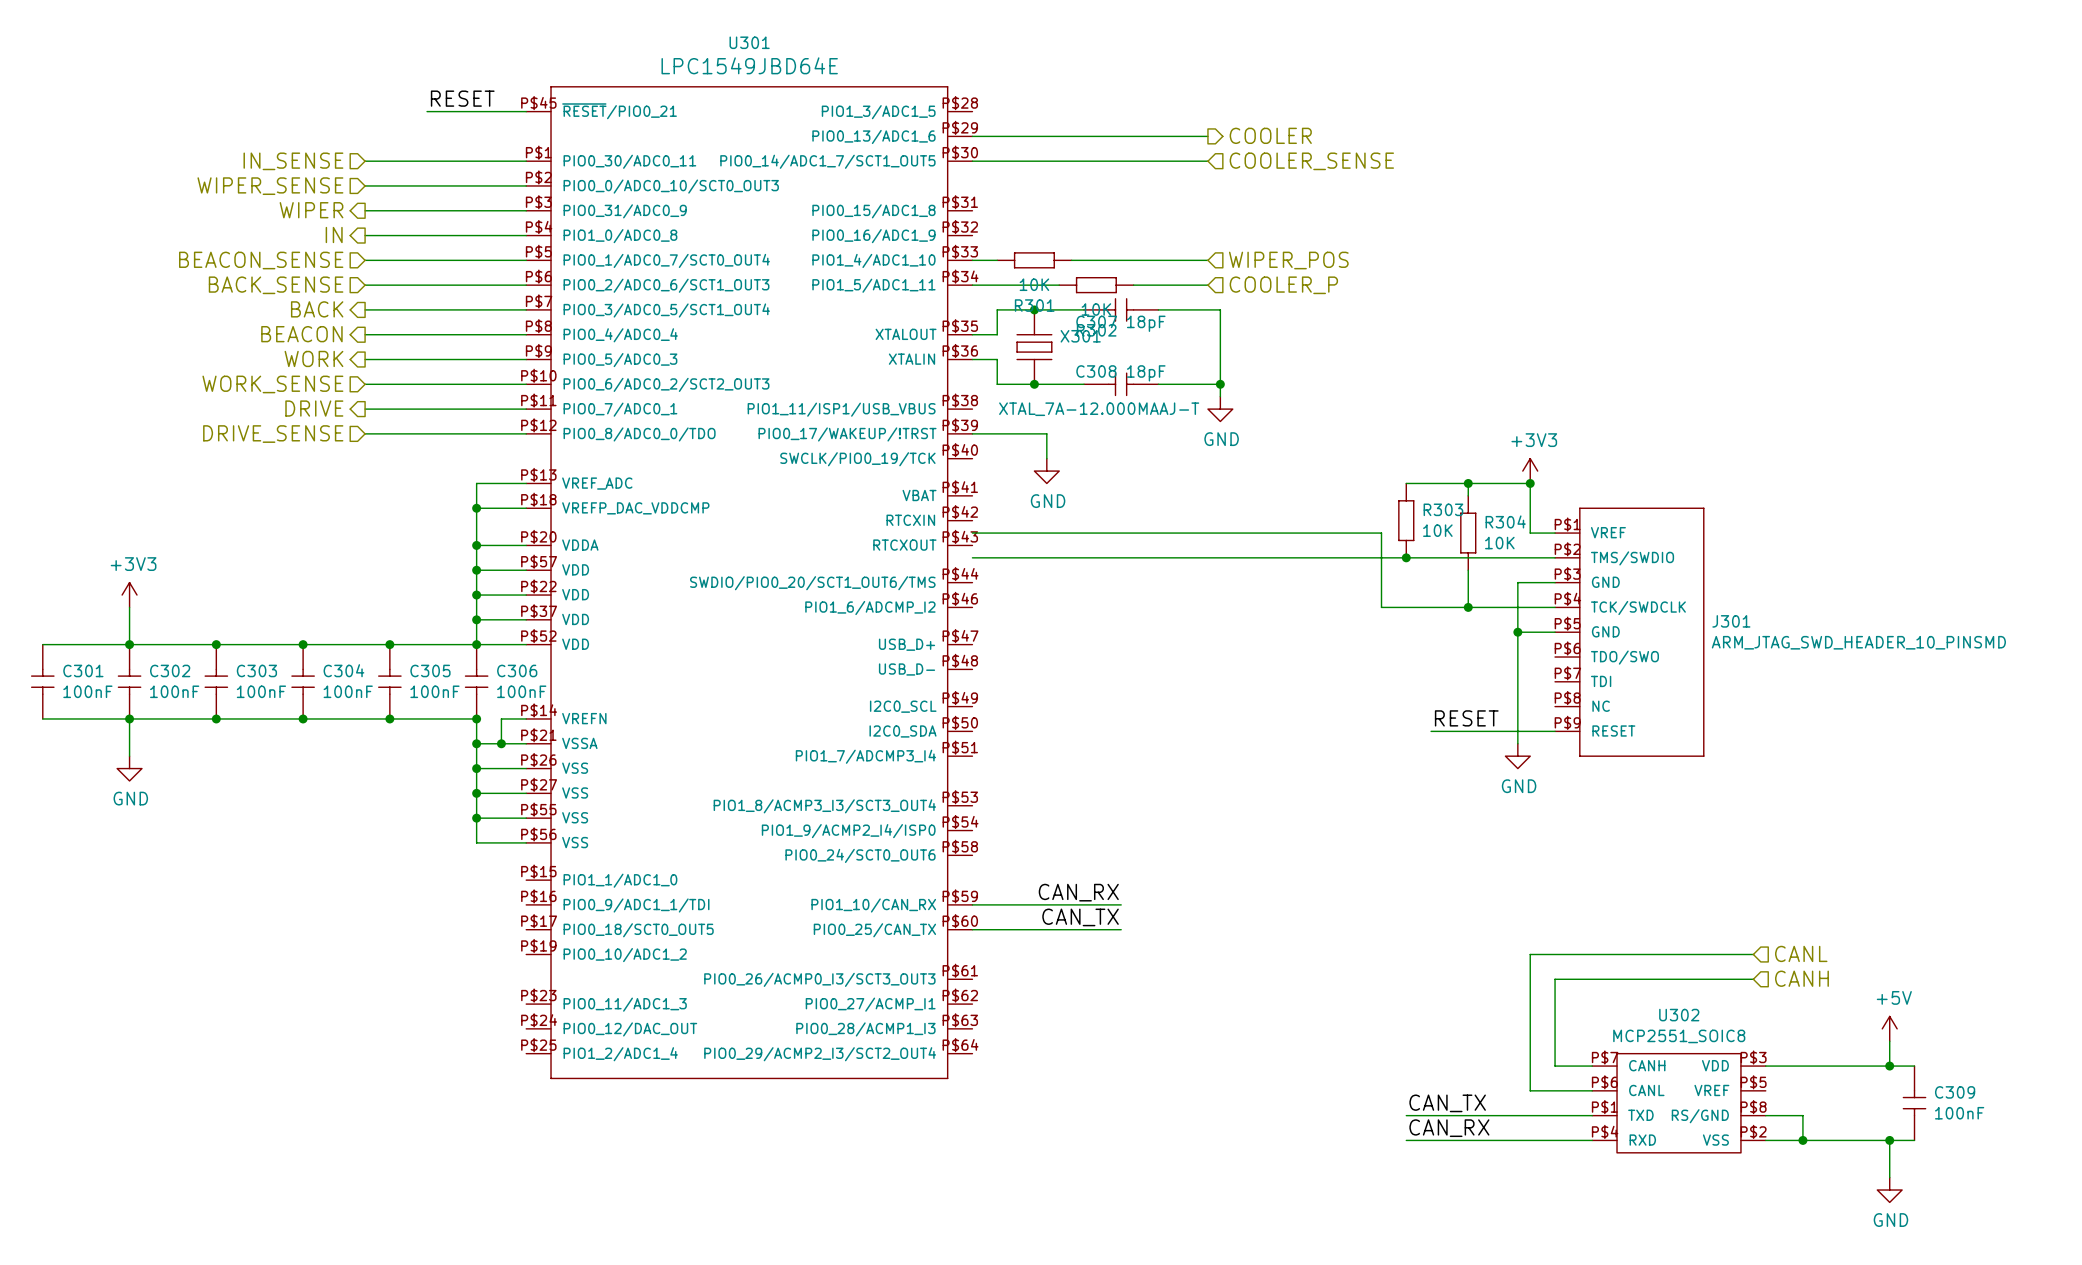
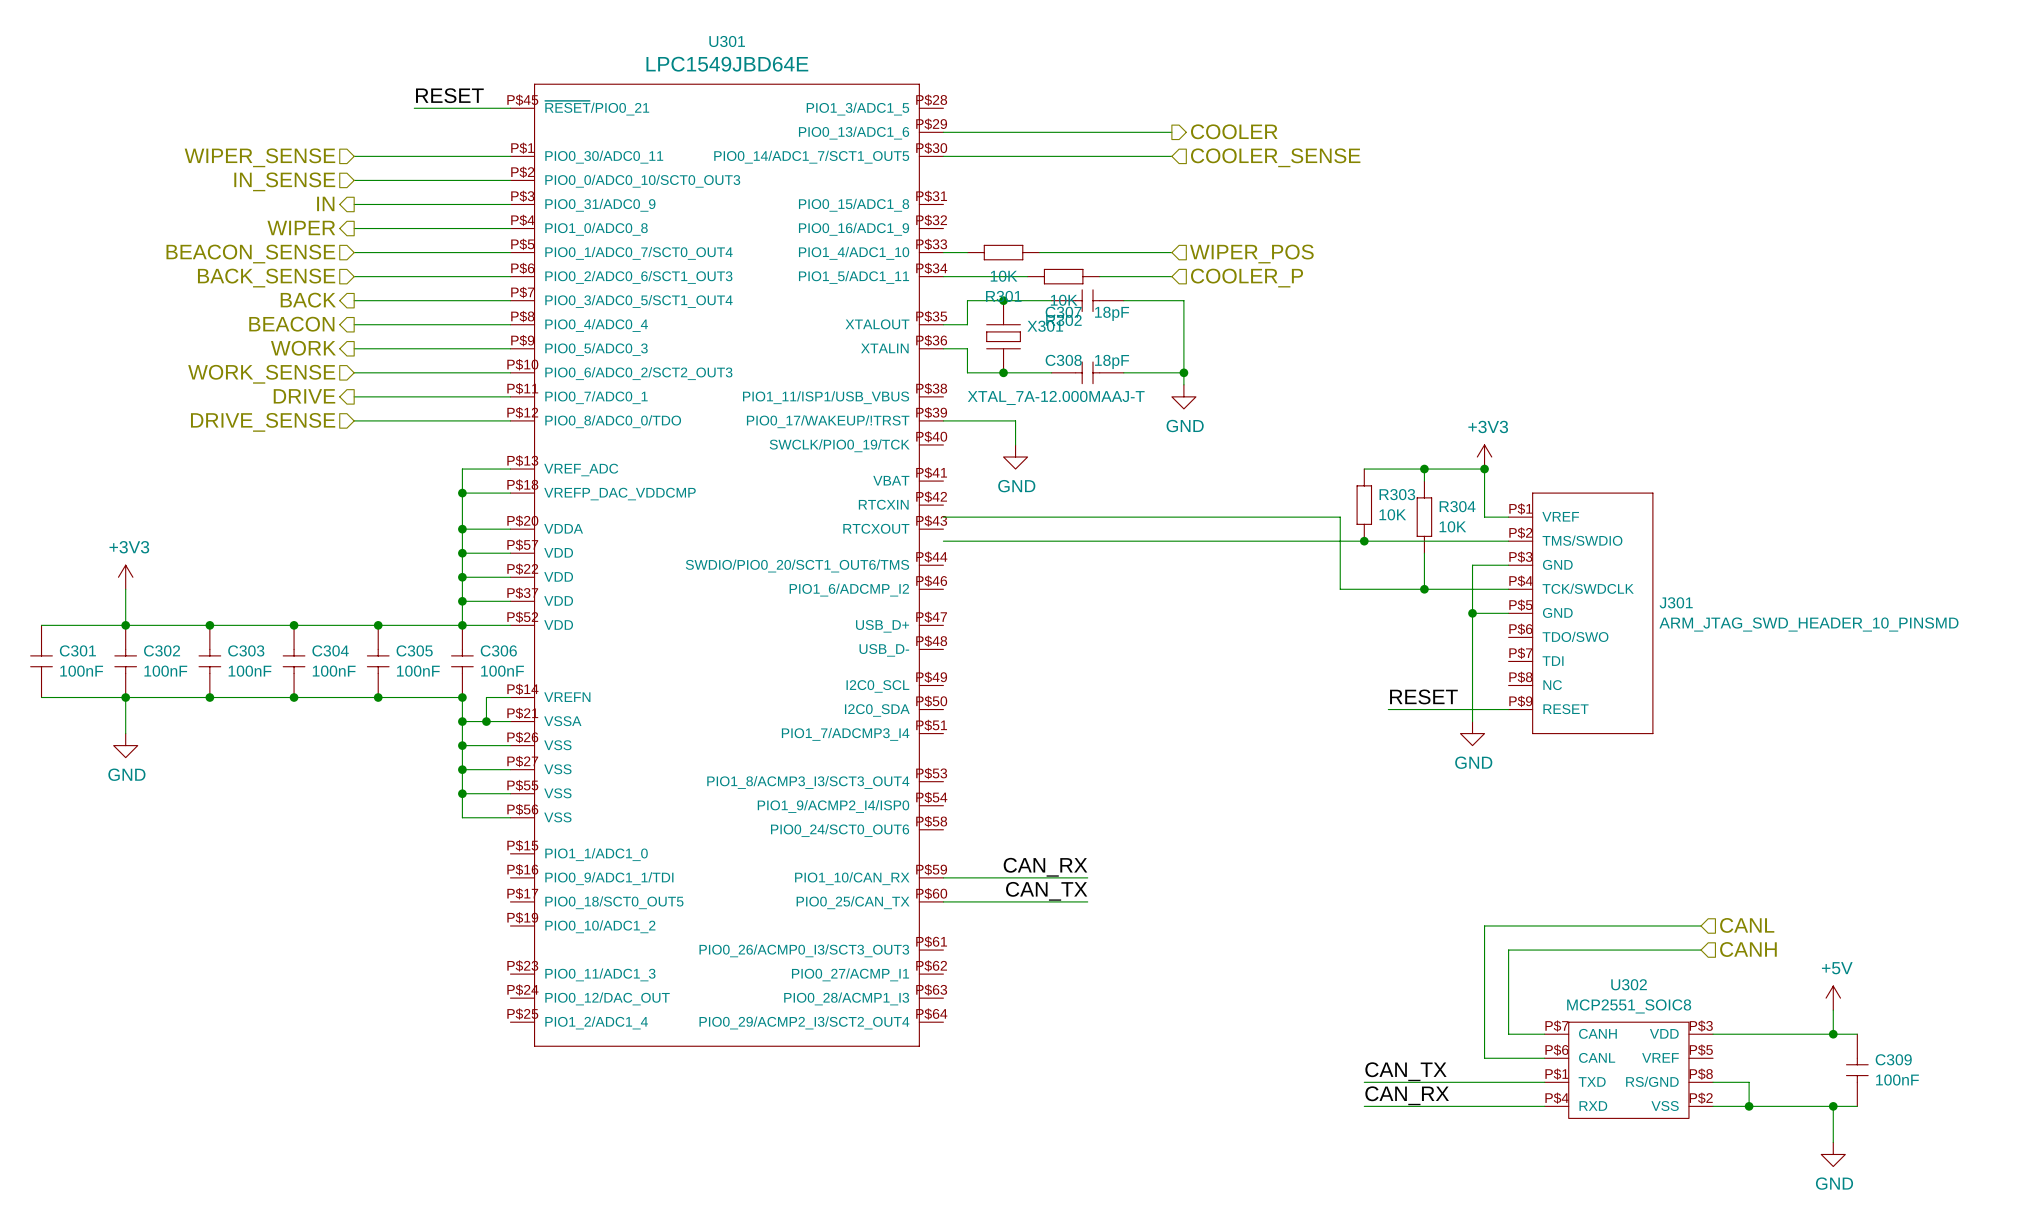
hierarchical label: IN_SENSE (293, 161) -> WIPER_SENSE (259, 157)
hierarchical label: WIPER_SENSE (270, 186) -> IN_SENSE (284, 181)
hierarchical label: WIPER (311, 210) -> IN (325, 203)
hierarchical label: IN (334, 235) -> WIPER (301, 227)

